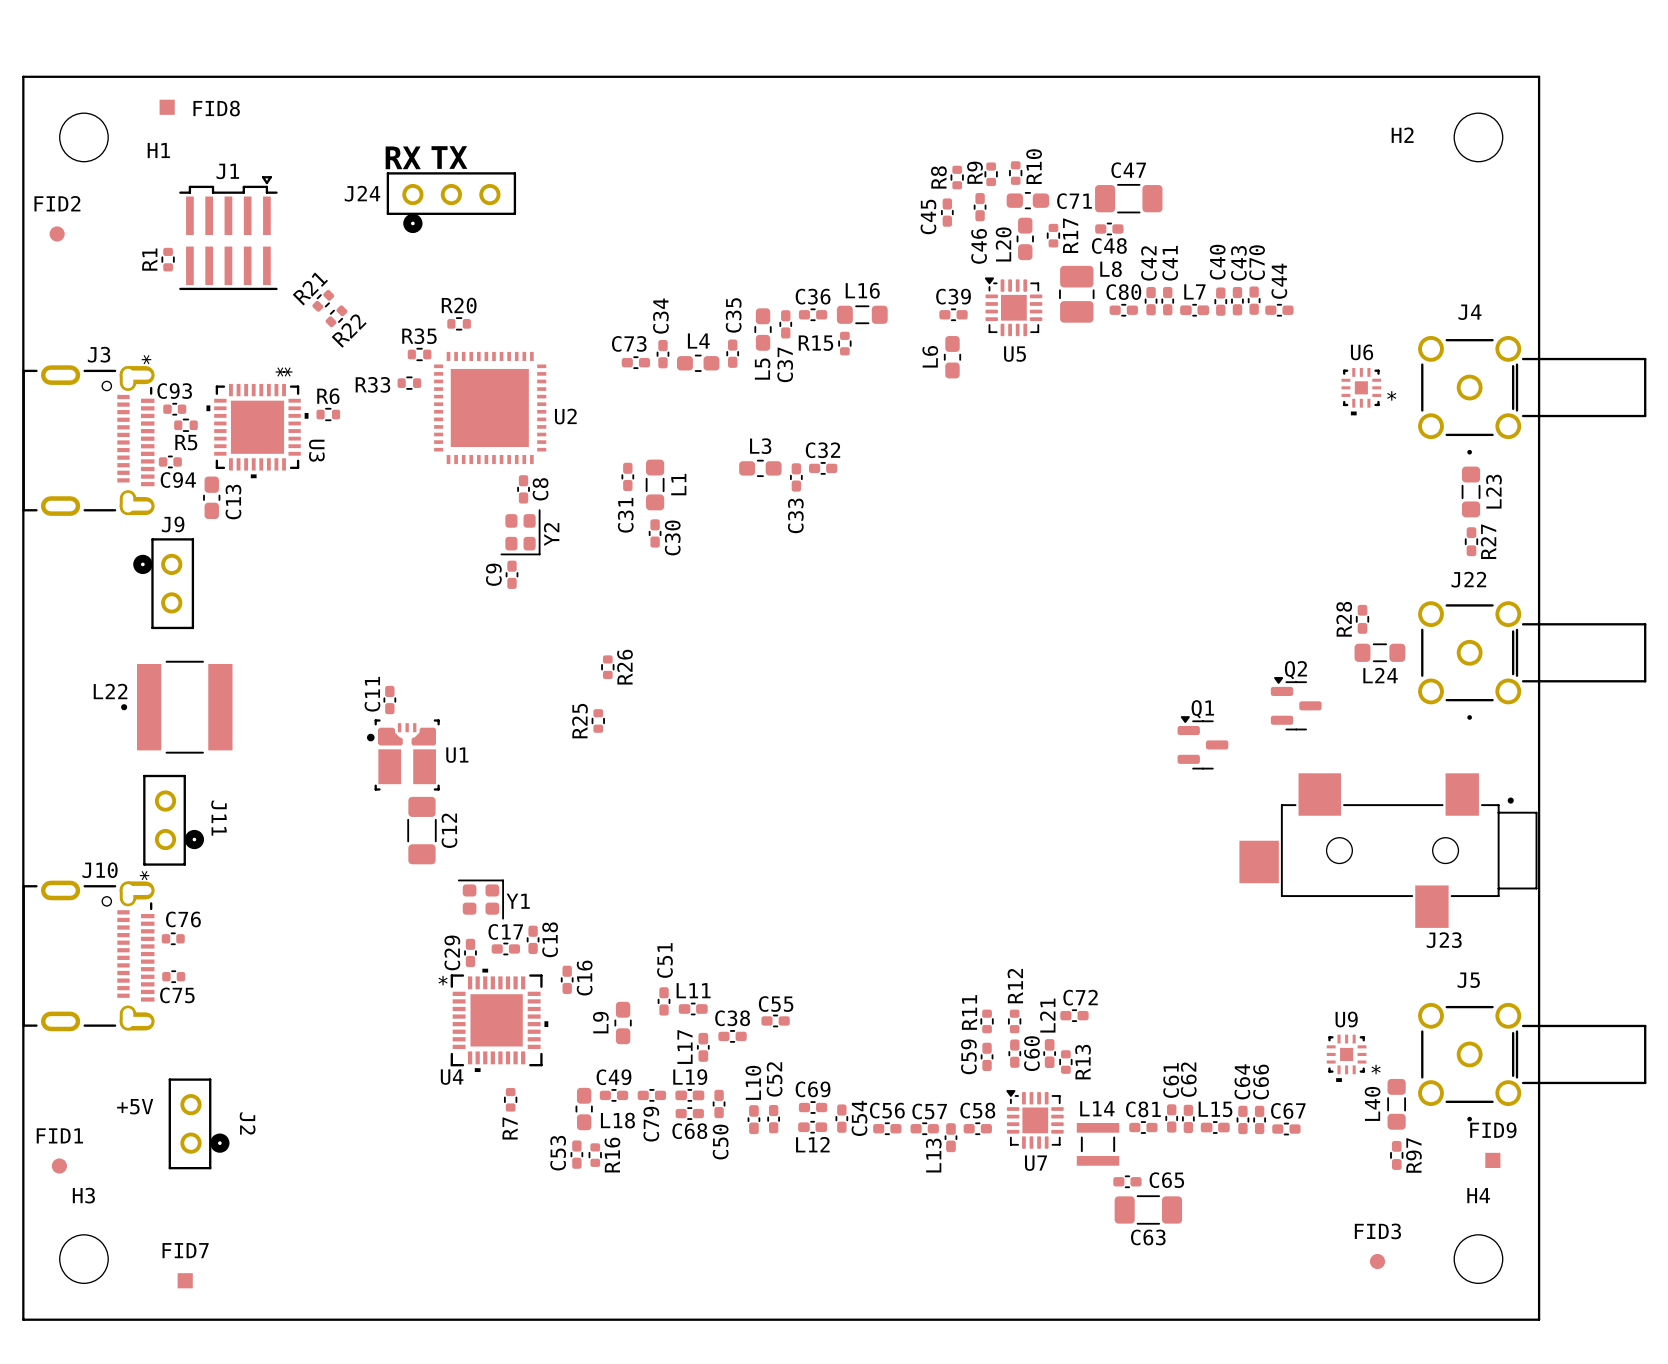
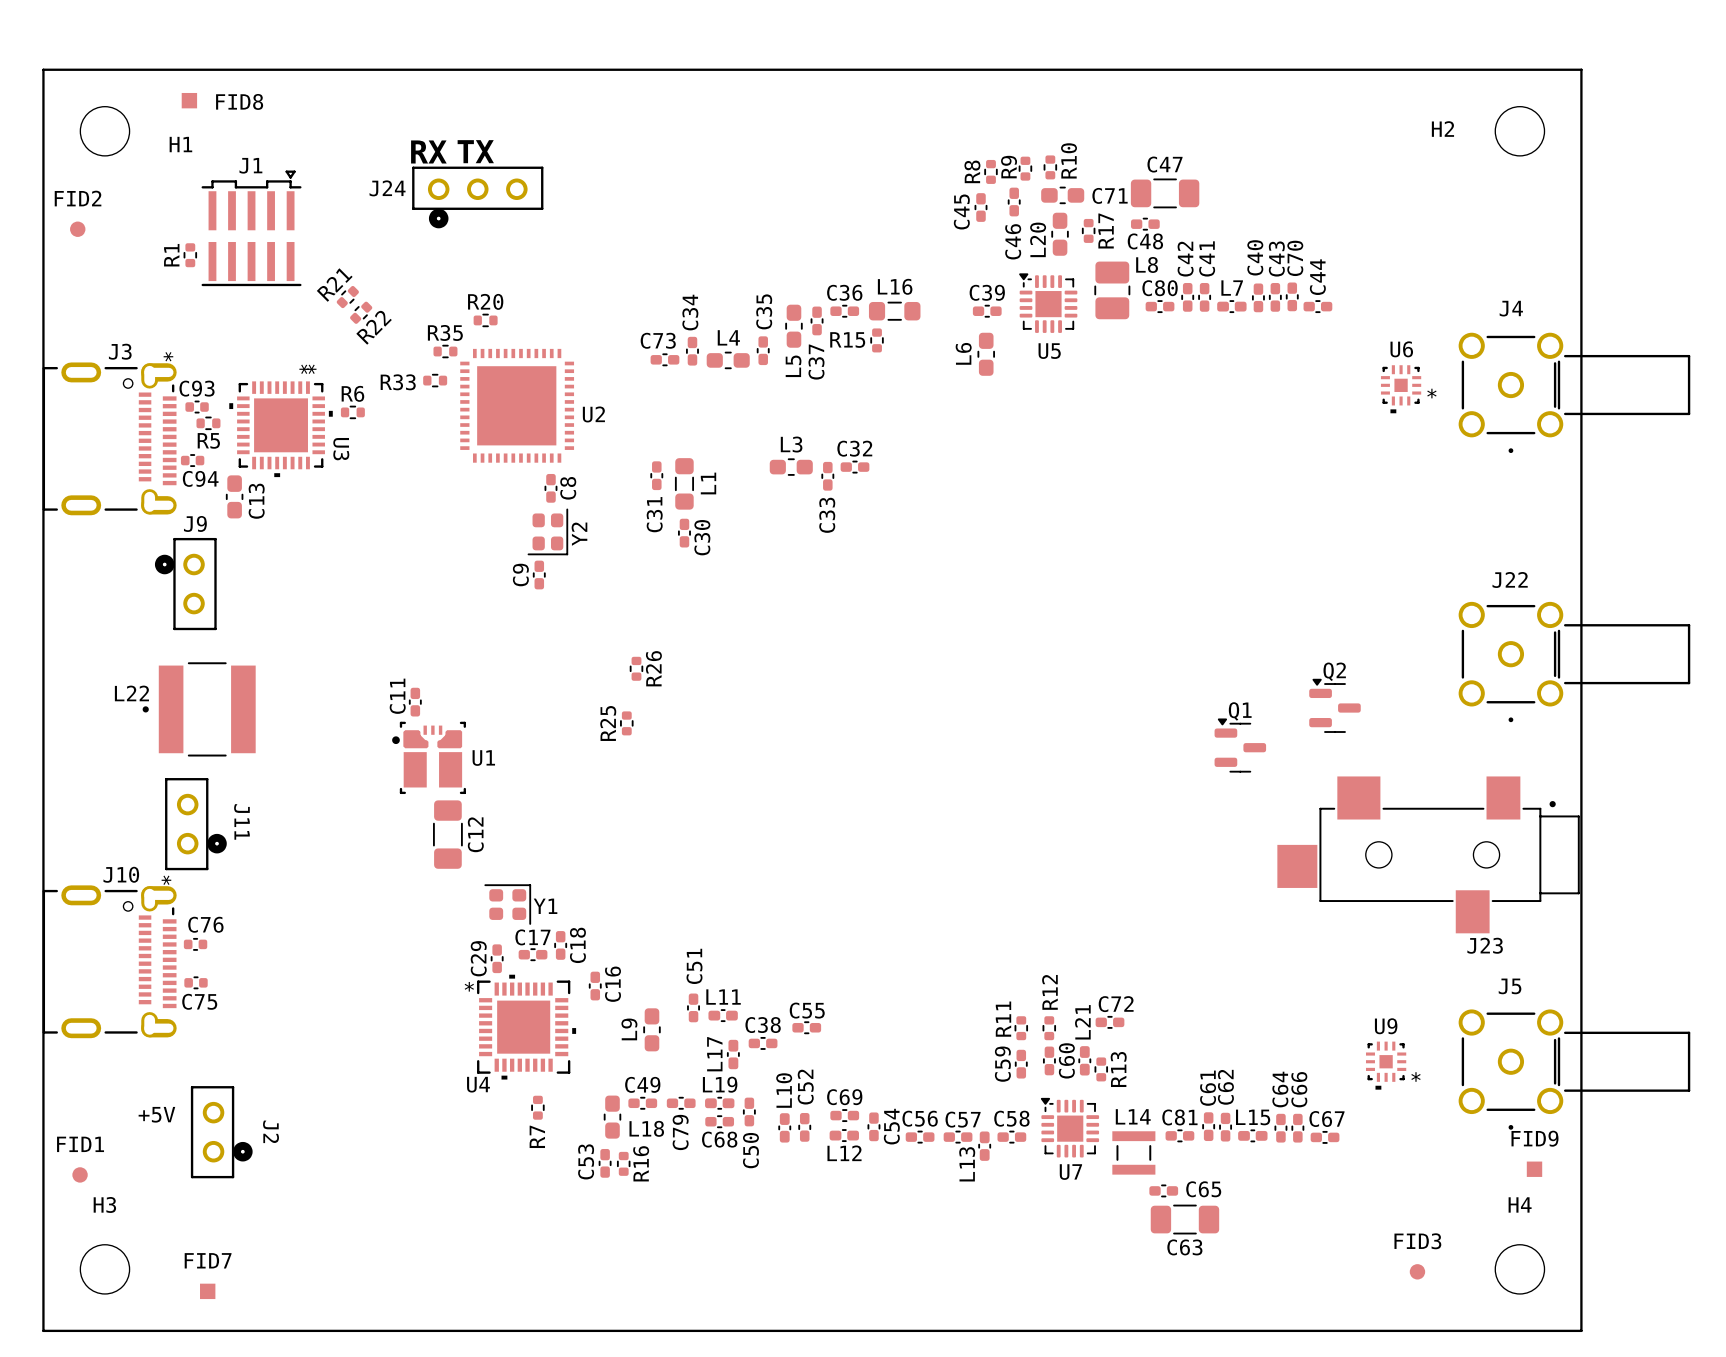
L23: (1471, 491) -> none
R27: (1471, 541) -> none
R28: (1362, 619) -> none
L24: (1379, 652) -> none
L40: (1396, 1104) -> none
R97: (1396, 1155) -> none

